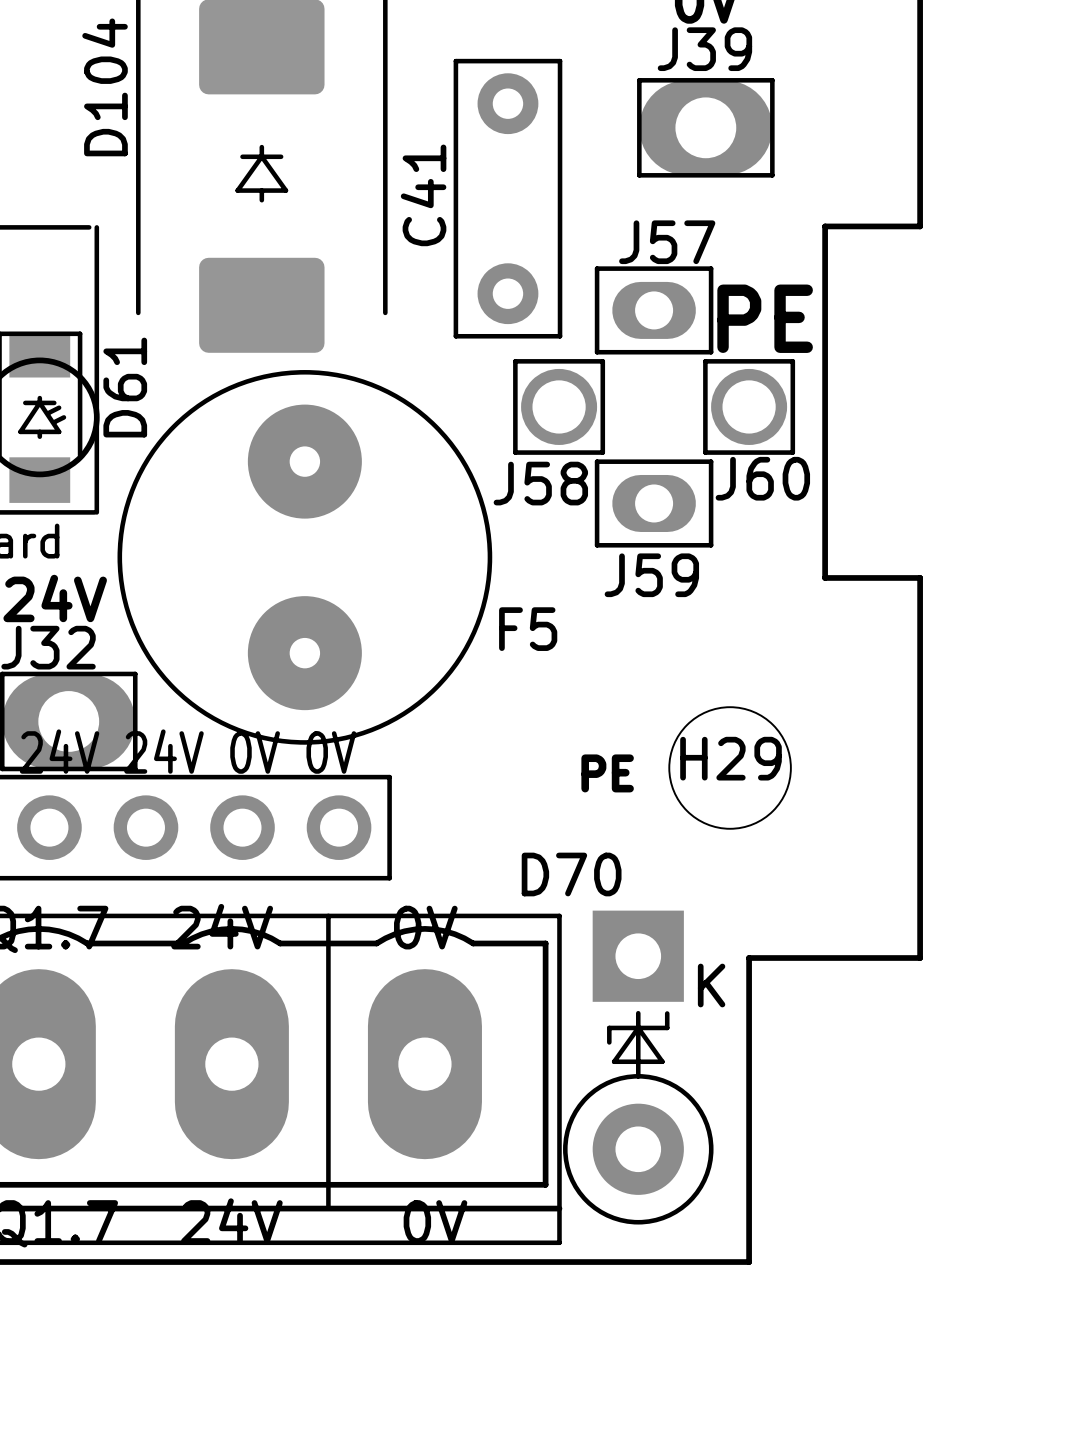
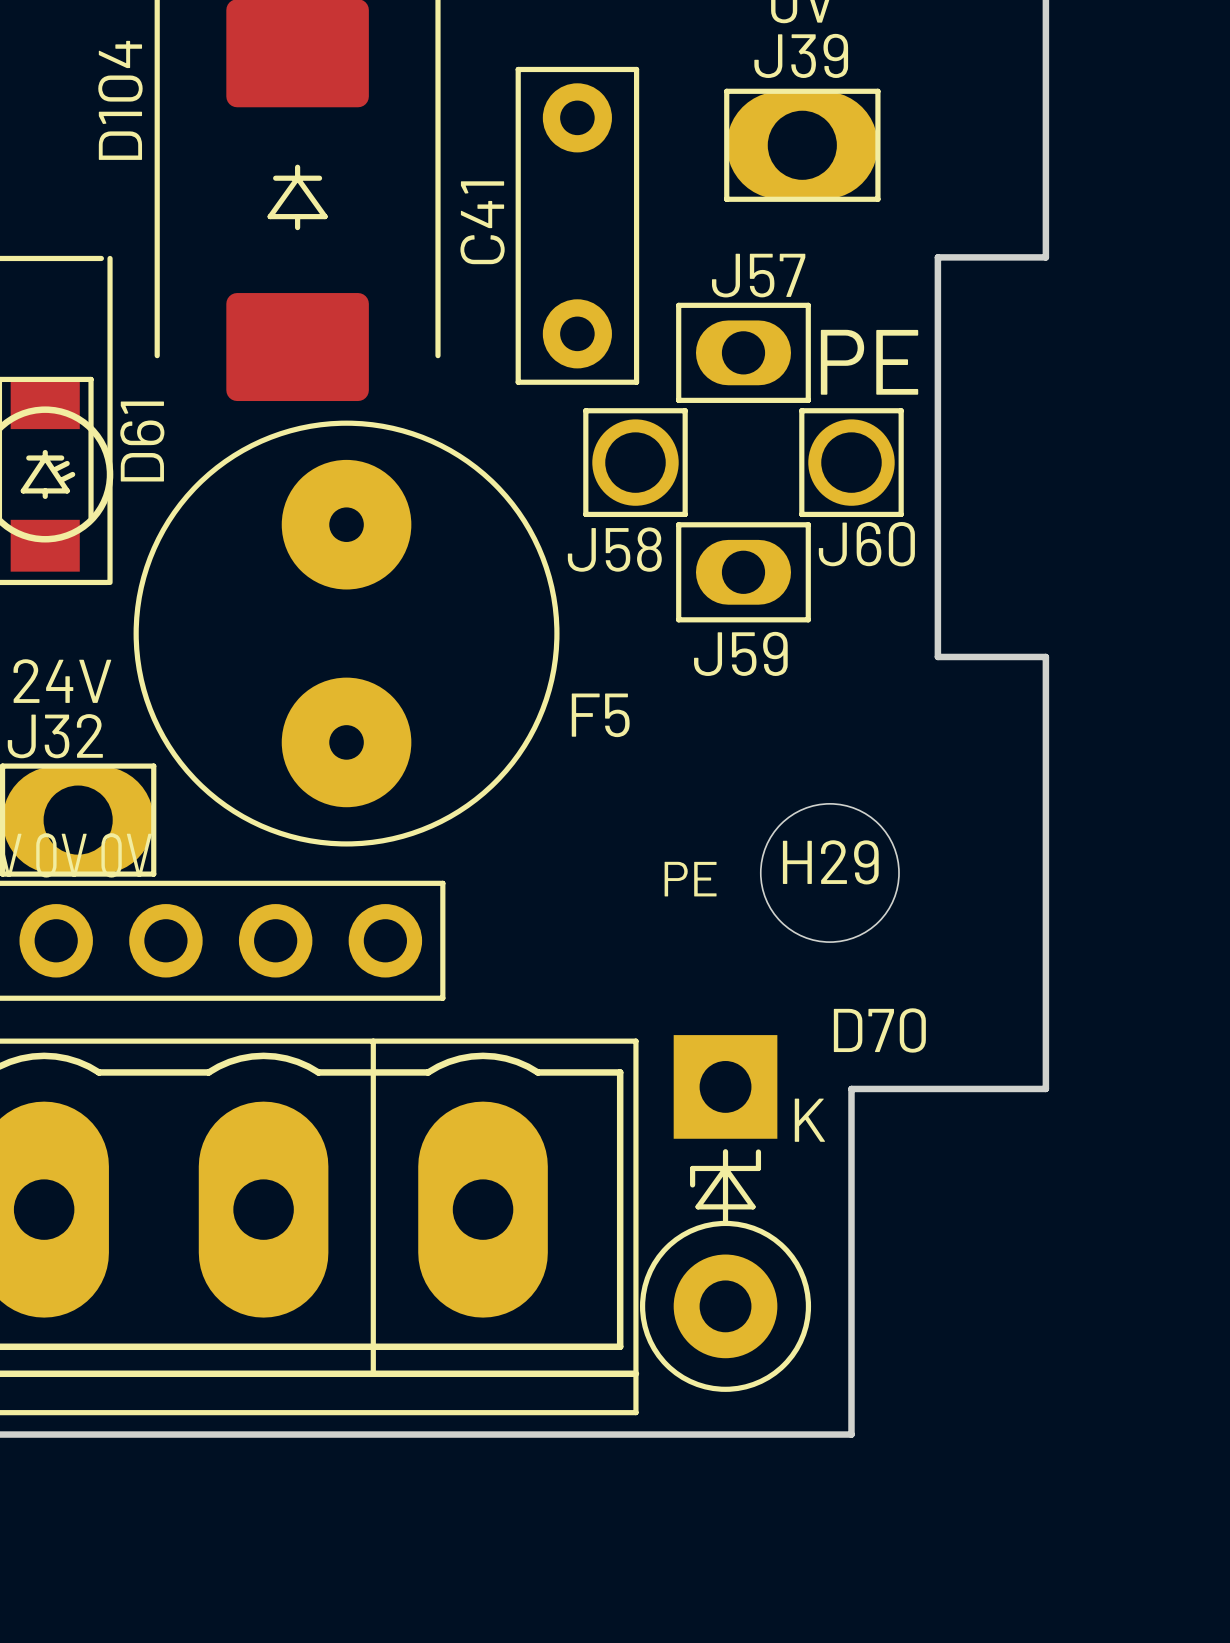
D70 name position: D70 (571, 874) -> D70 (879, 1030)

